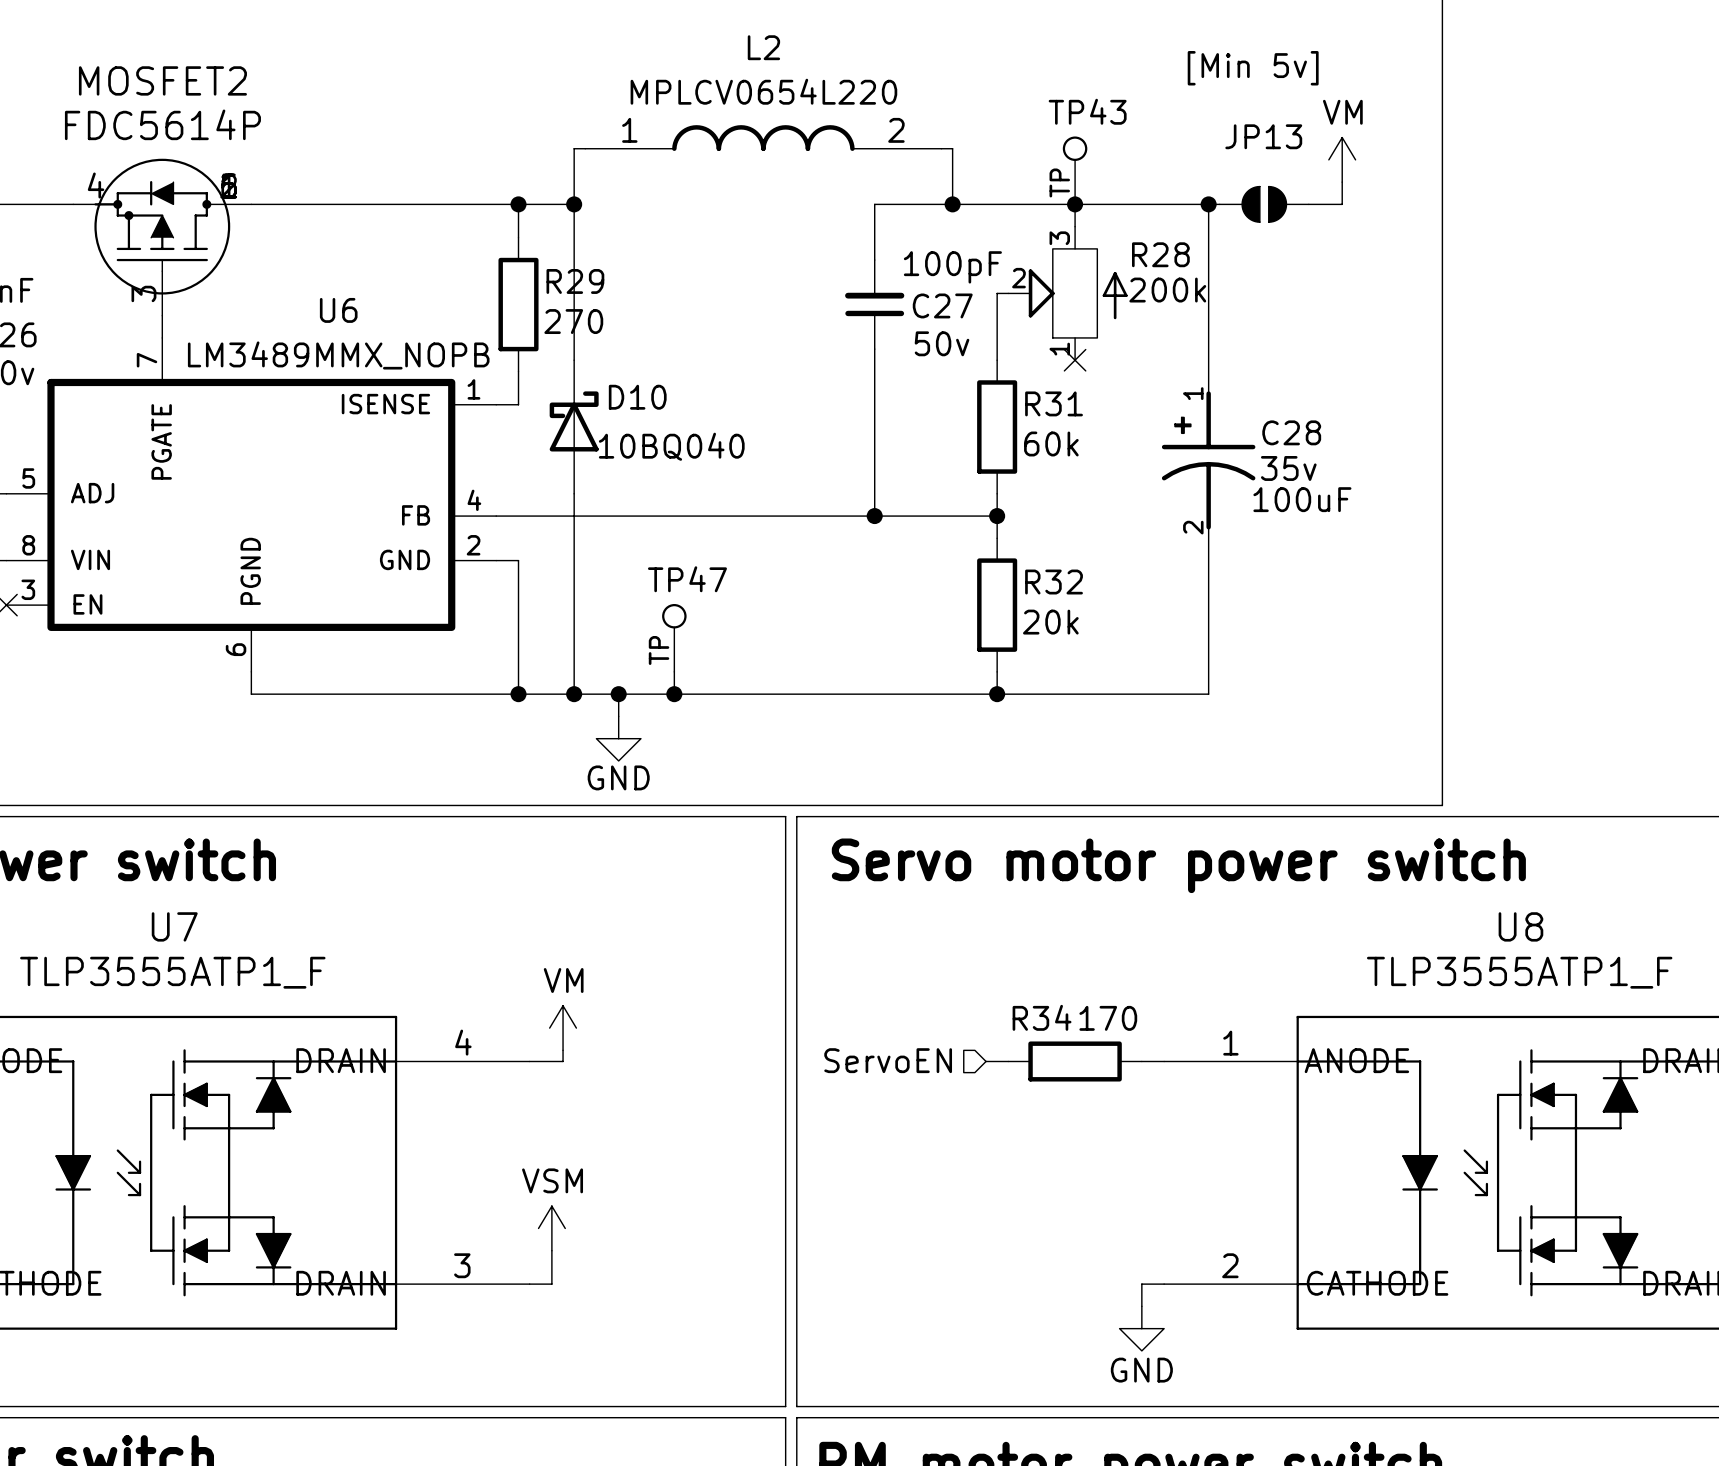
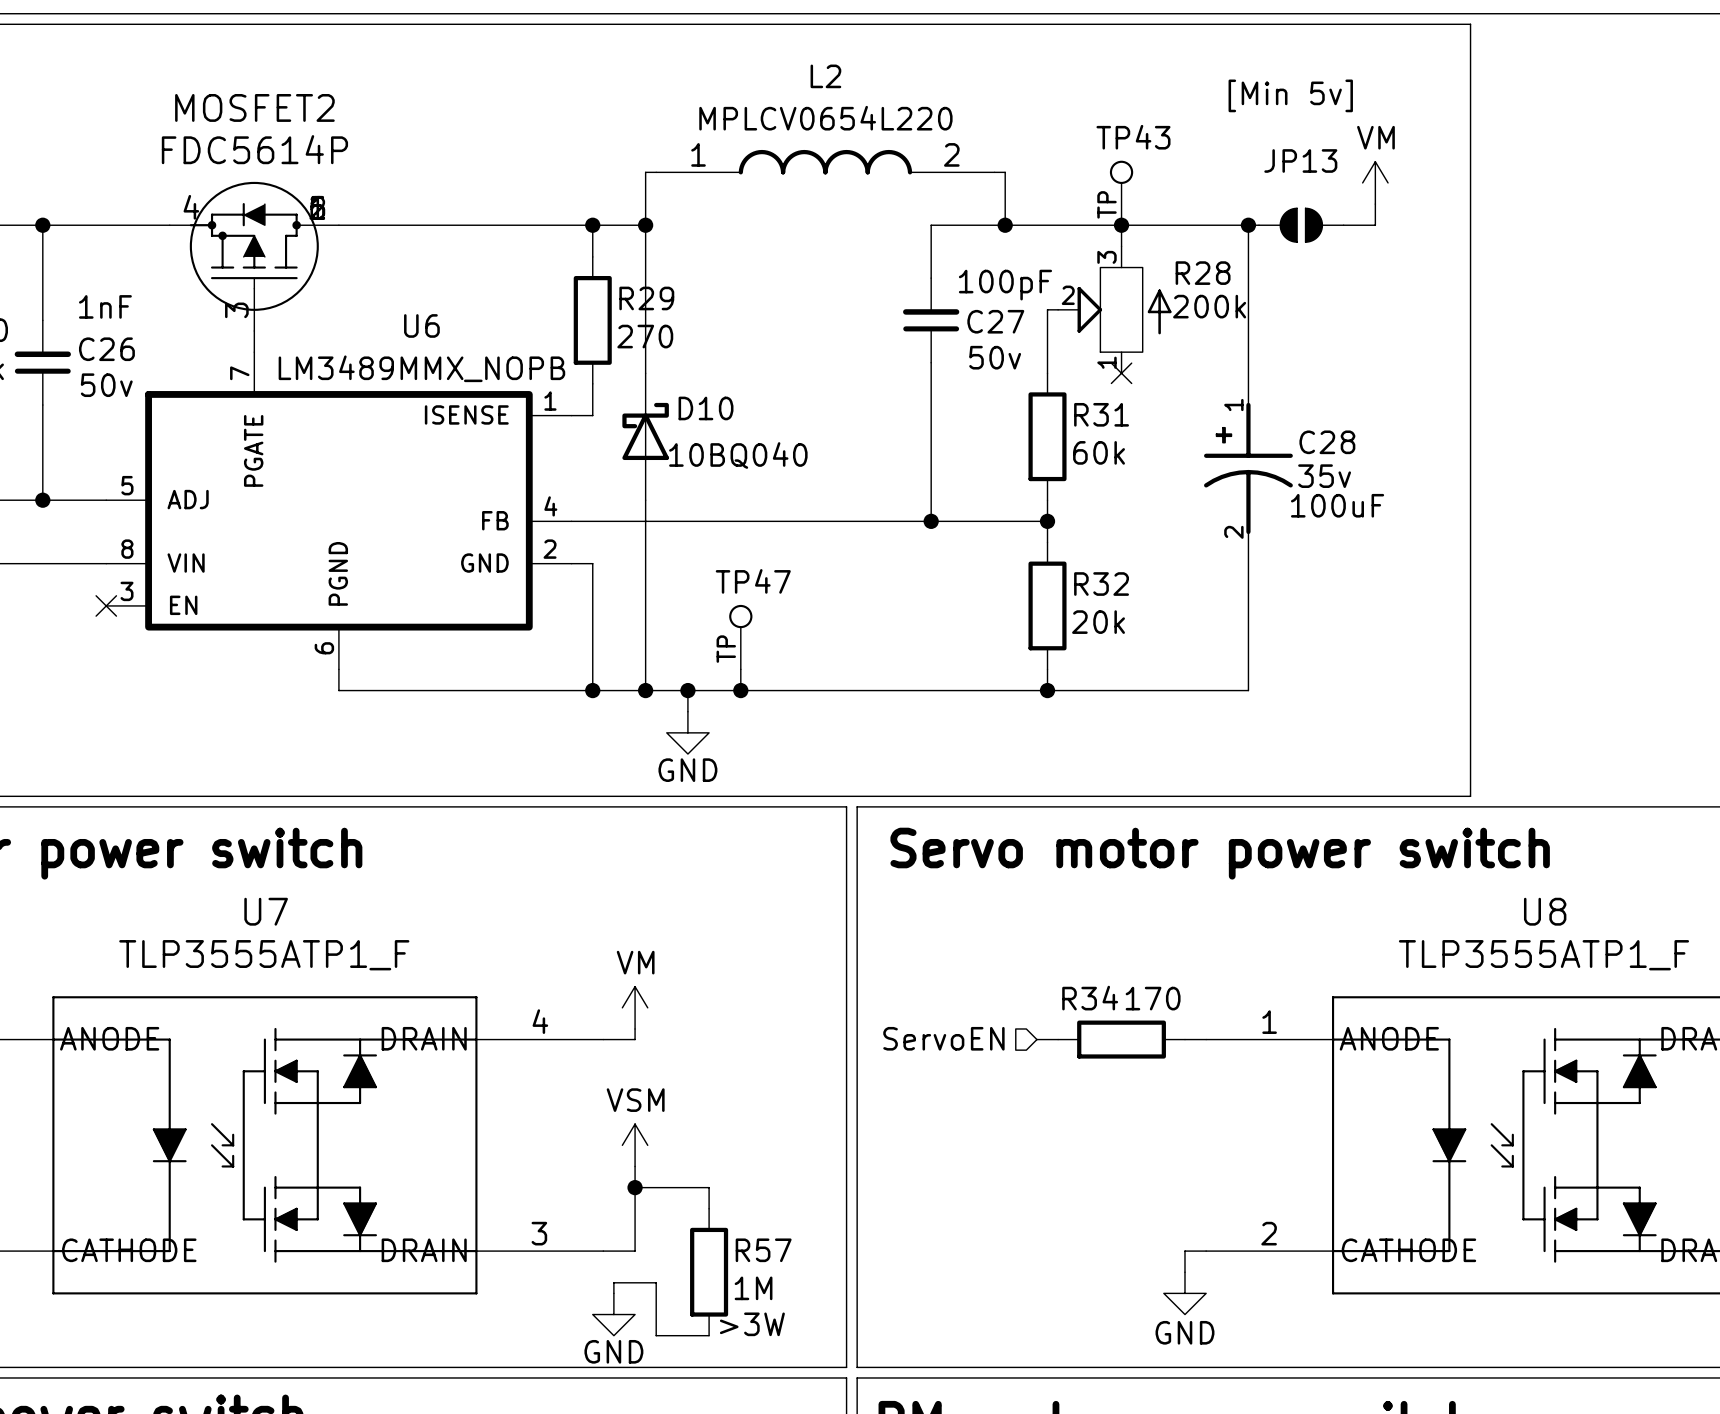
wire: none -> (635, 1187) (709, 1187) (709, 1208)
junction: none -> (635, 1187)
power symbol position: VSM (551, 1228) -> VSM (635, 1145)
wire: (551, 1250) (551, 1284) -> (635, 1166) (635, 1251) (624, 1251)
R57: none -> 1M (709, 1272)
wire: none -> (613, 1293) (613, 1282) (656, 1282) (656, 1335) (709, 1335)
power symbol: none -> GND (613, 1314)

